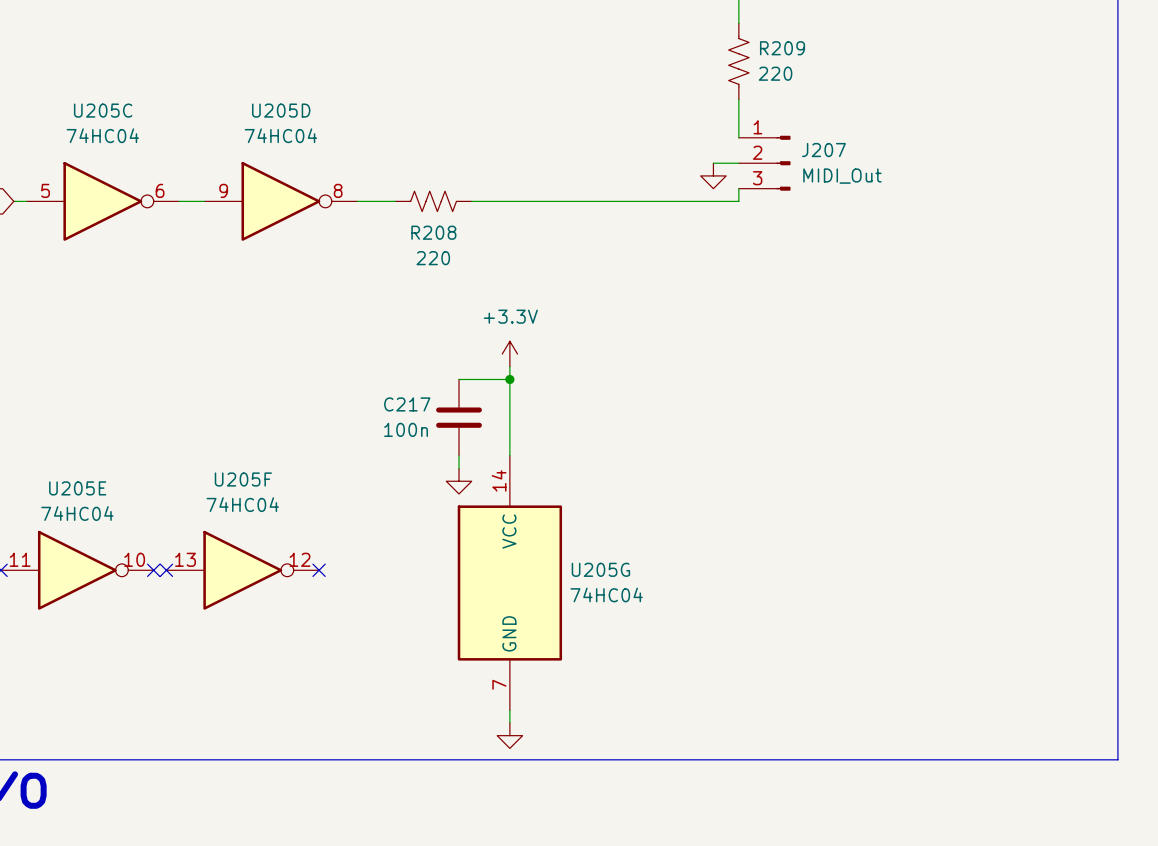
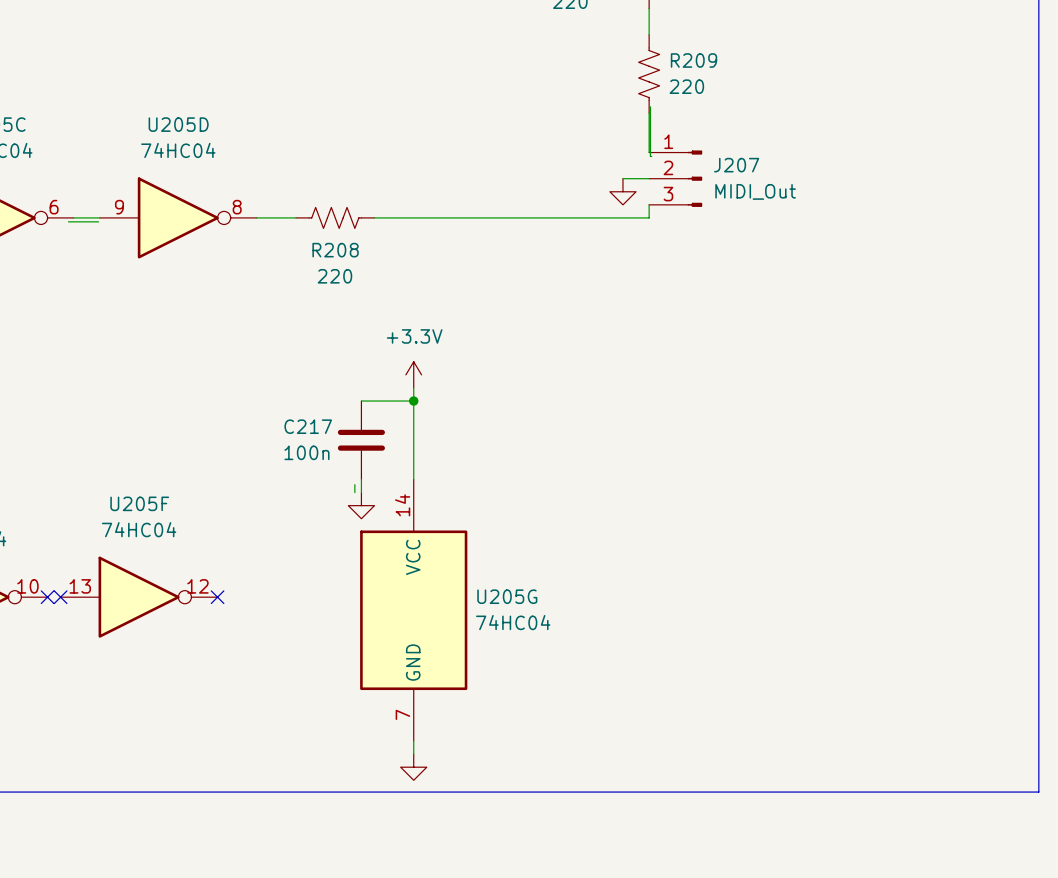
wire: none -> (650, 106) (651, 156)
wire: none -> (68, 221) (98, 221)
wire: none -> (354, 484) (354, 492)

